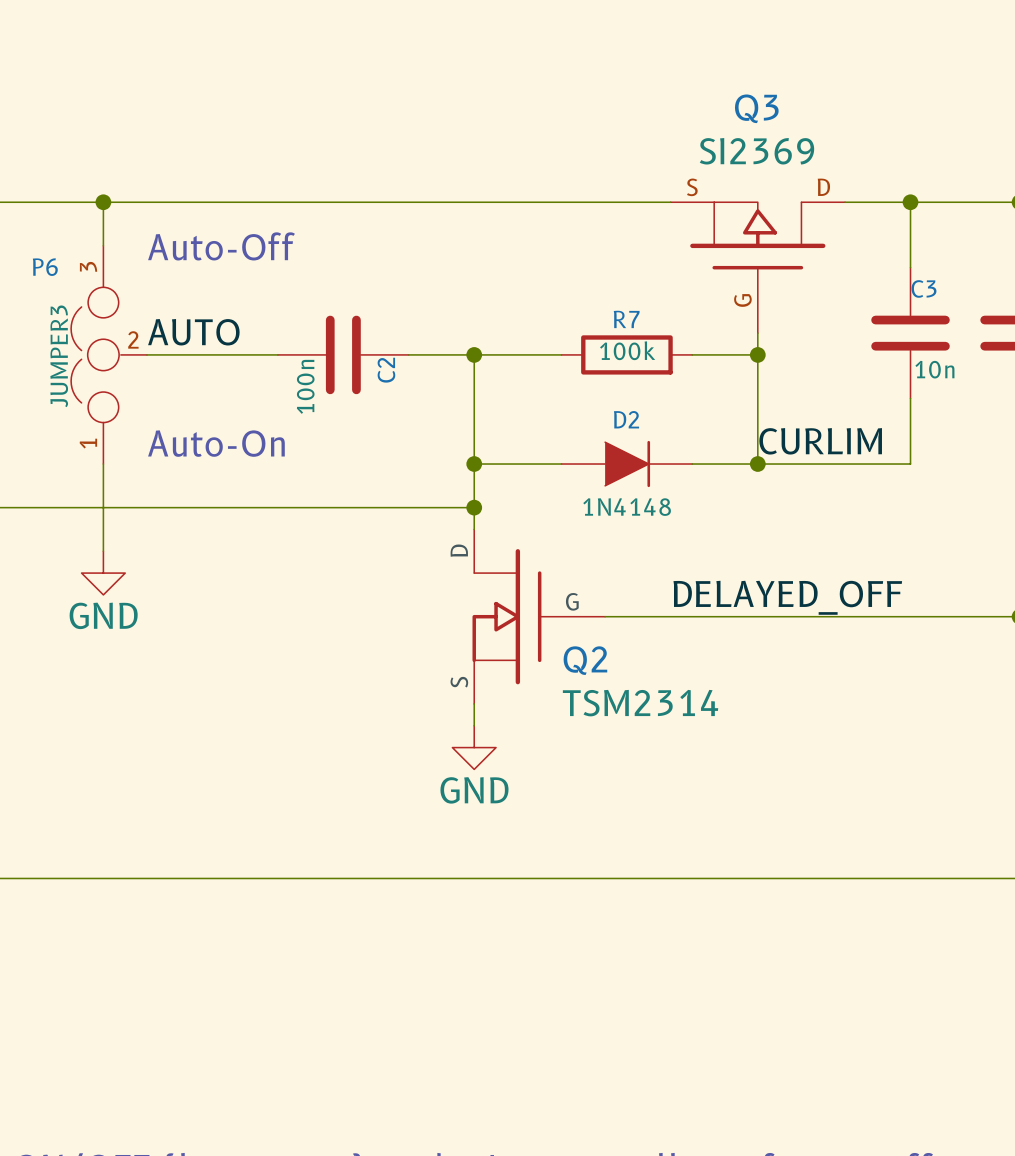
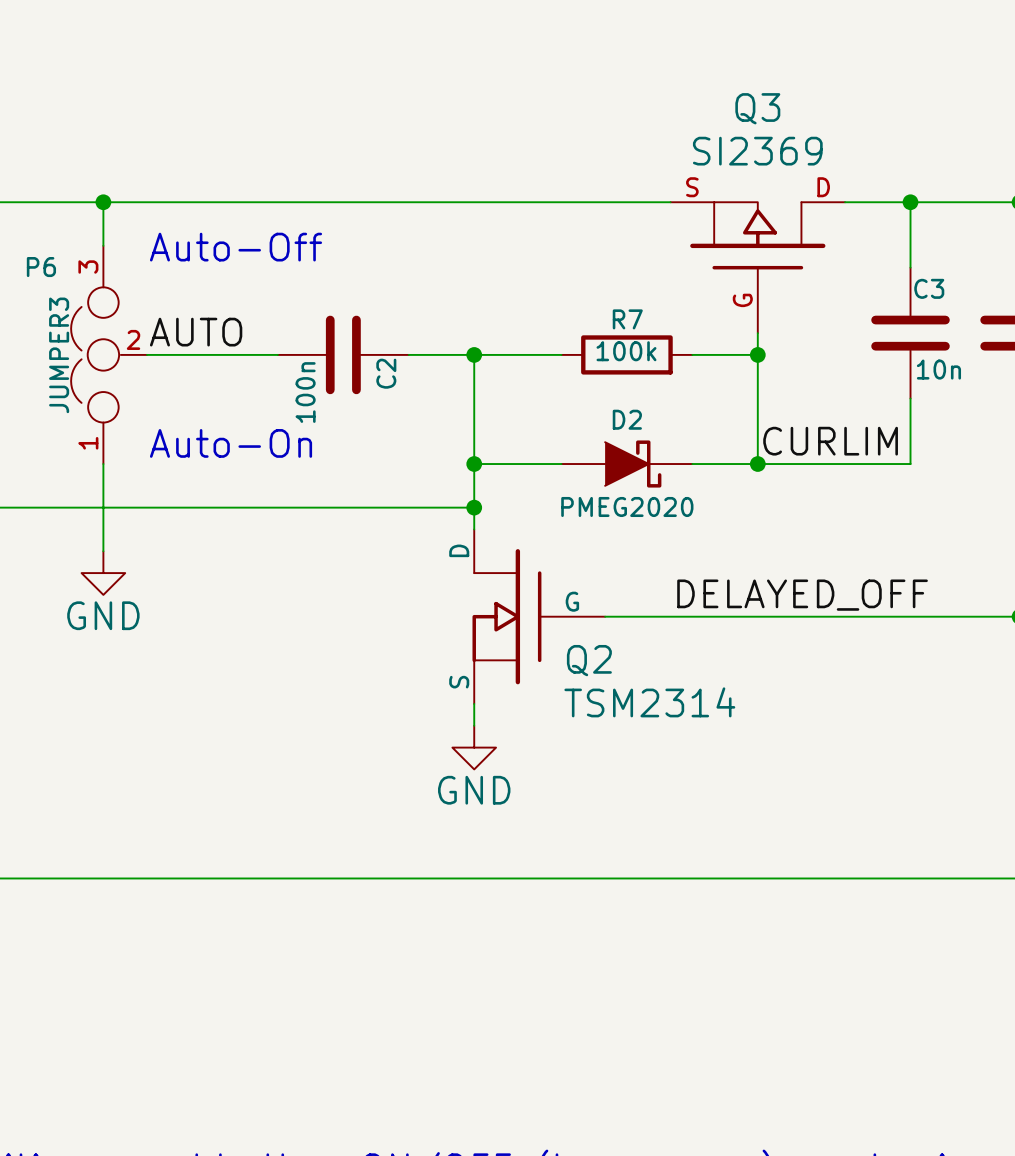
D2 symbol: [561, 440, 693, 488] -> [561, 440, 693, 488]
D2 value: 1N4148 (627, 507) -> PMEG2020 (627, 506)

